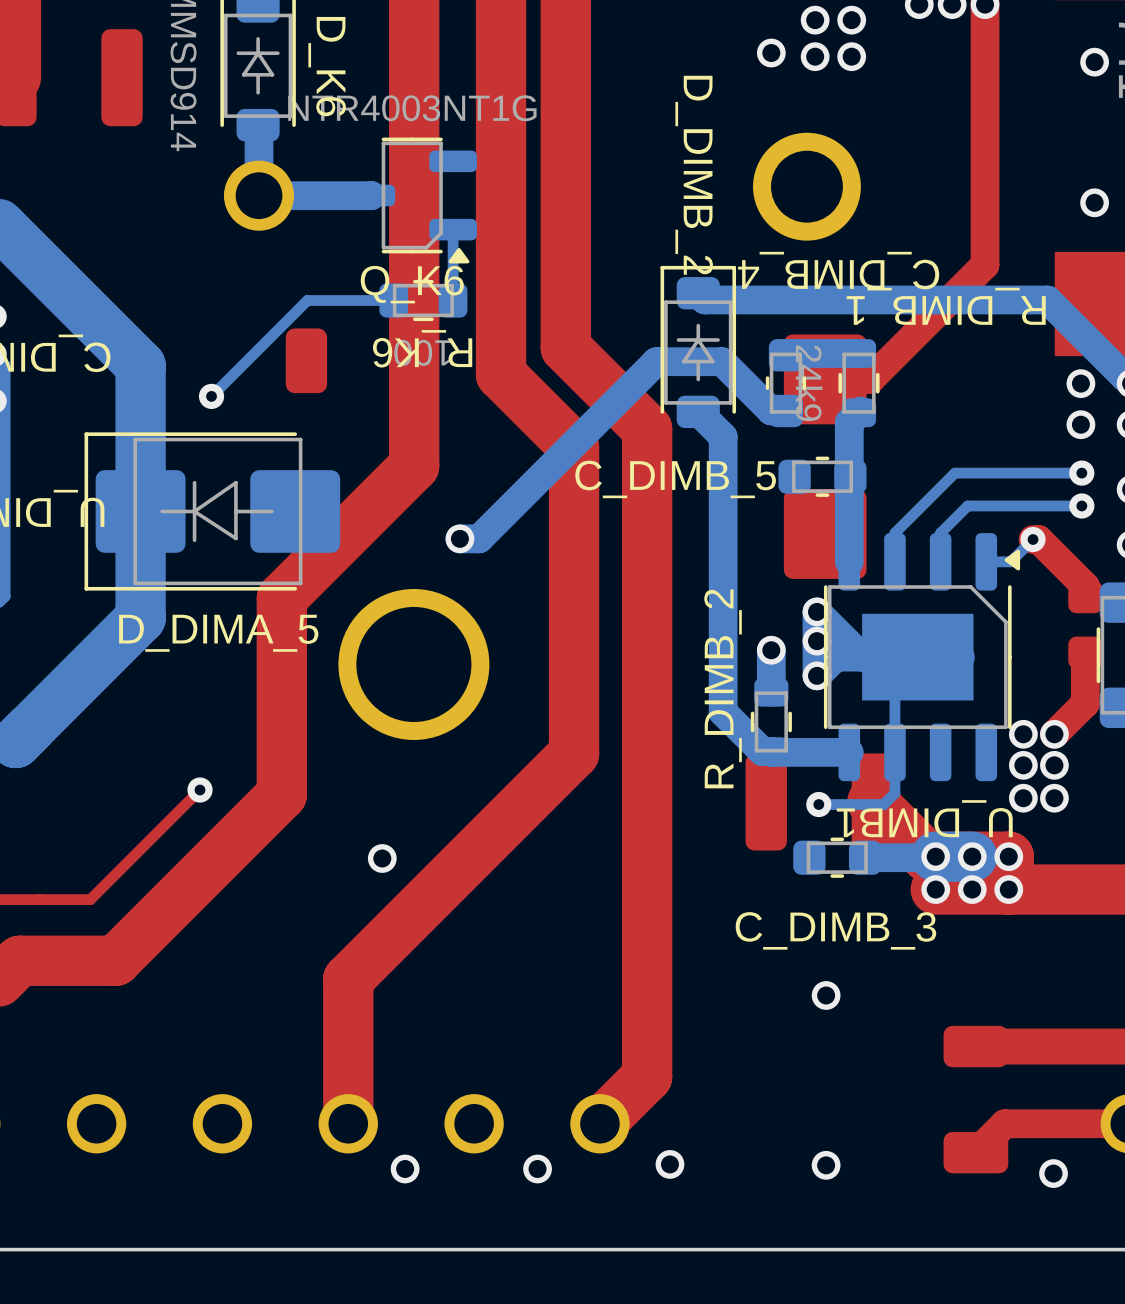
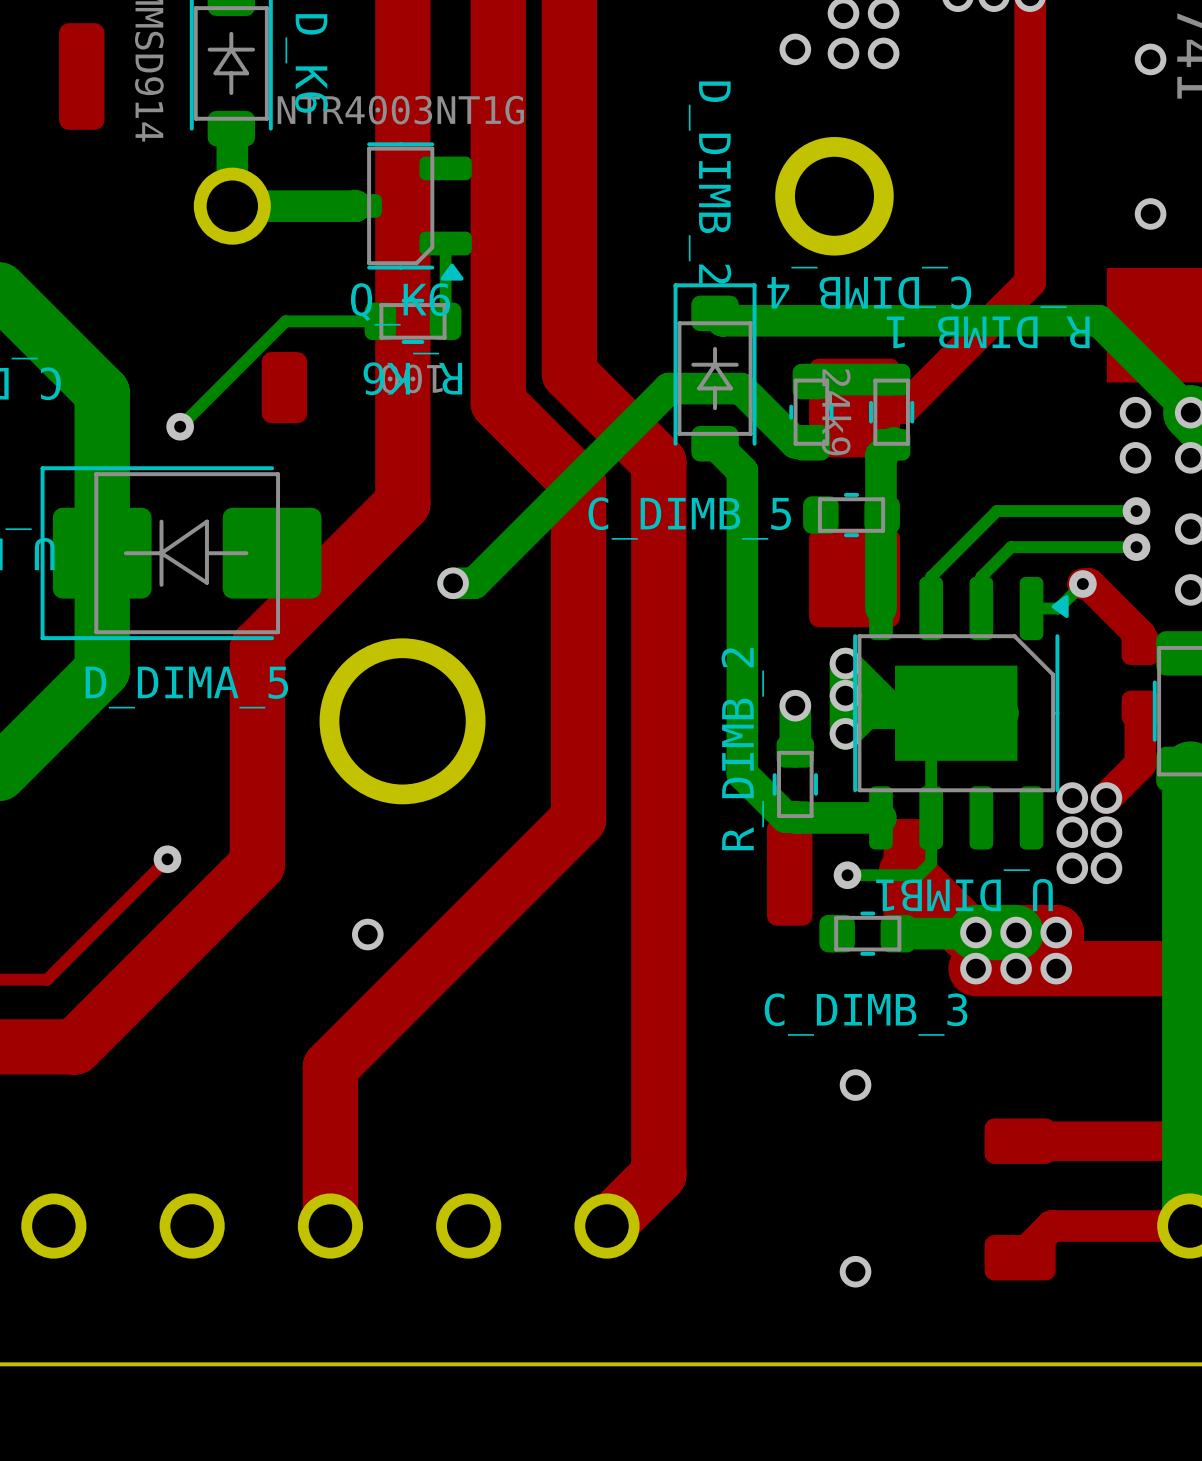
via: (669, 1164) -> none
via: (405, 1168) -> none
via: (537, 1168) -> none
via: (1053, 1173) -> none

